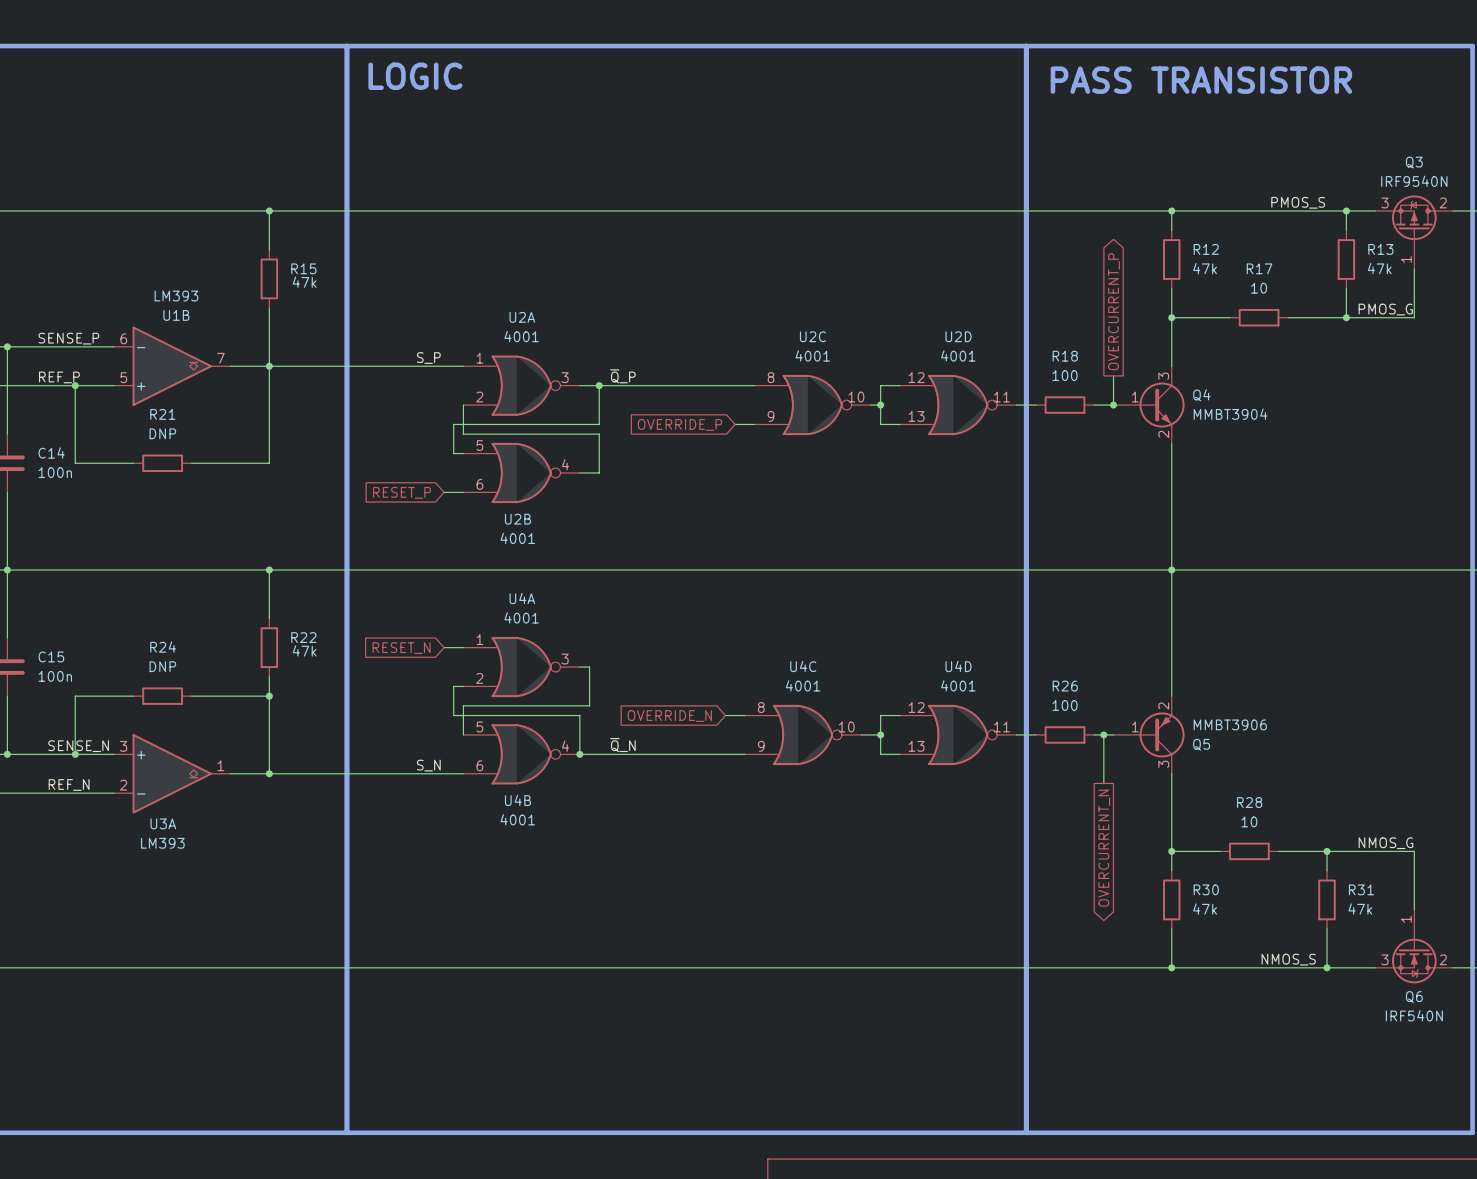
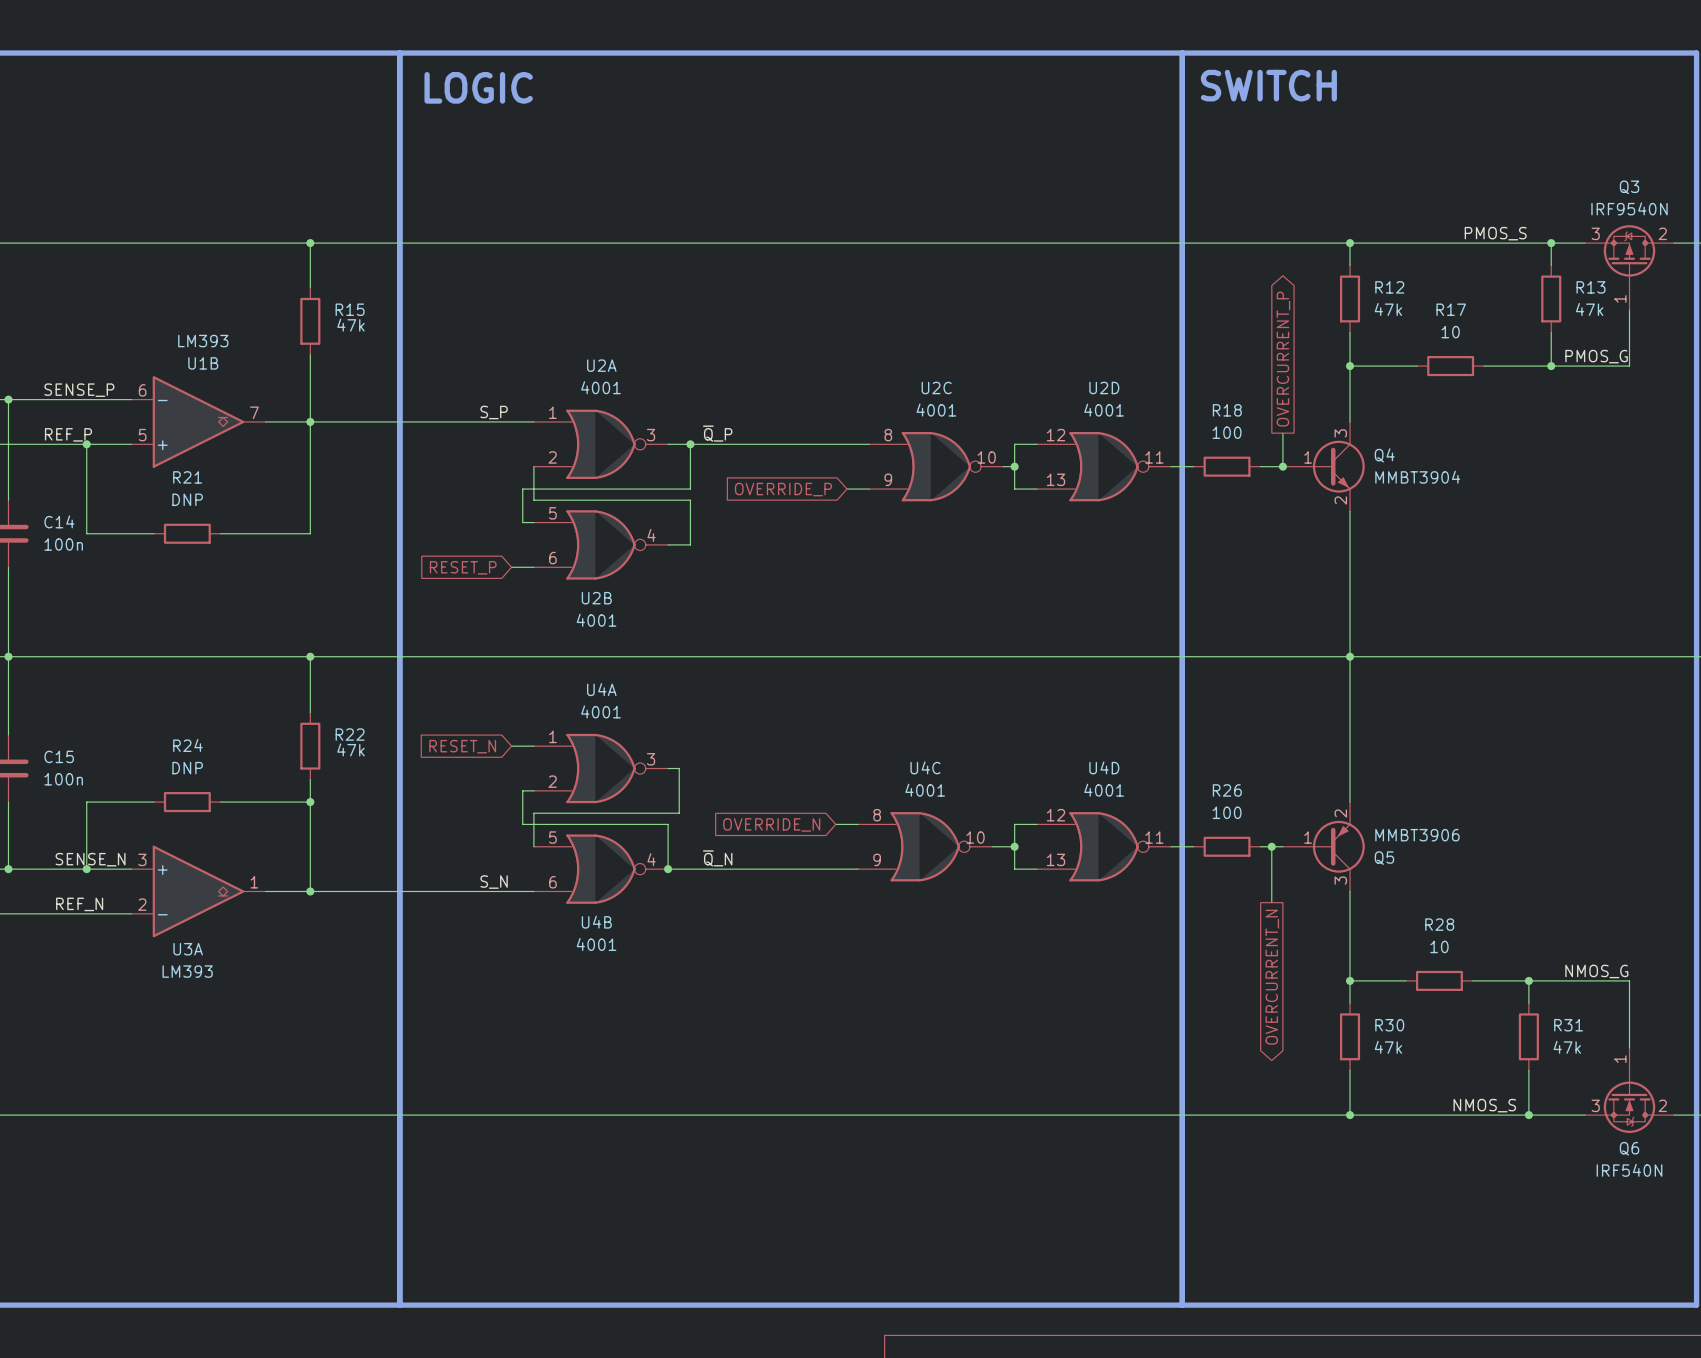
text: none -> SWITCH (1268, 85)
text: PASS TRANSISTOR (1201, 80) -> none

